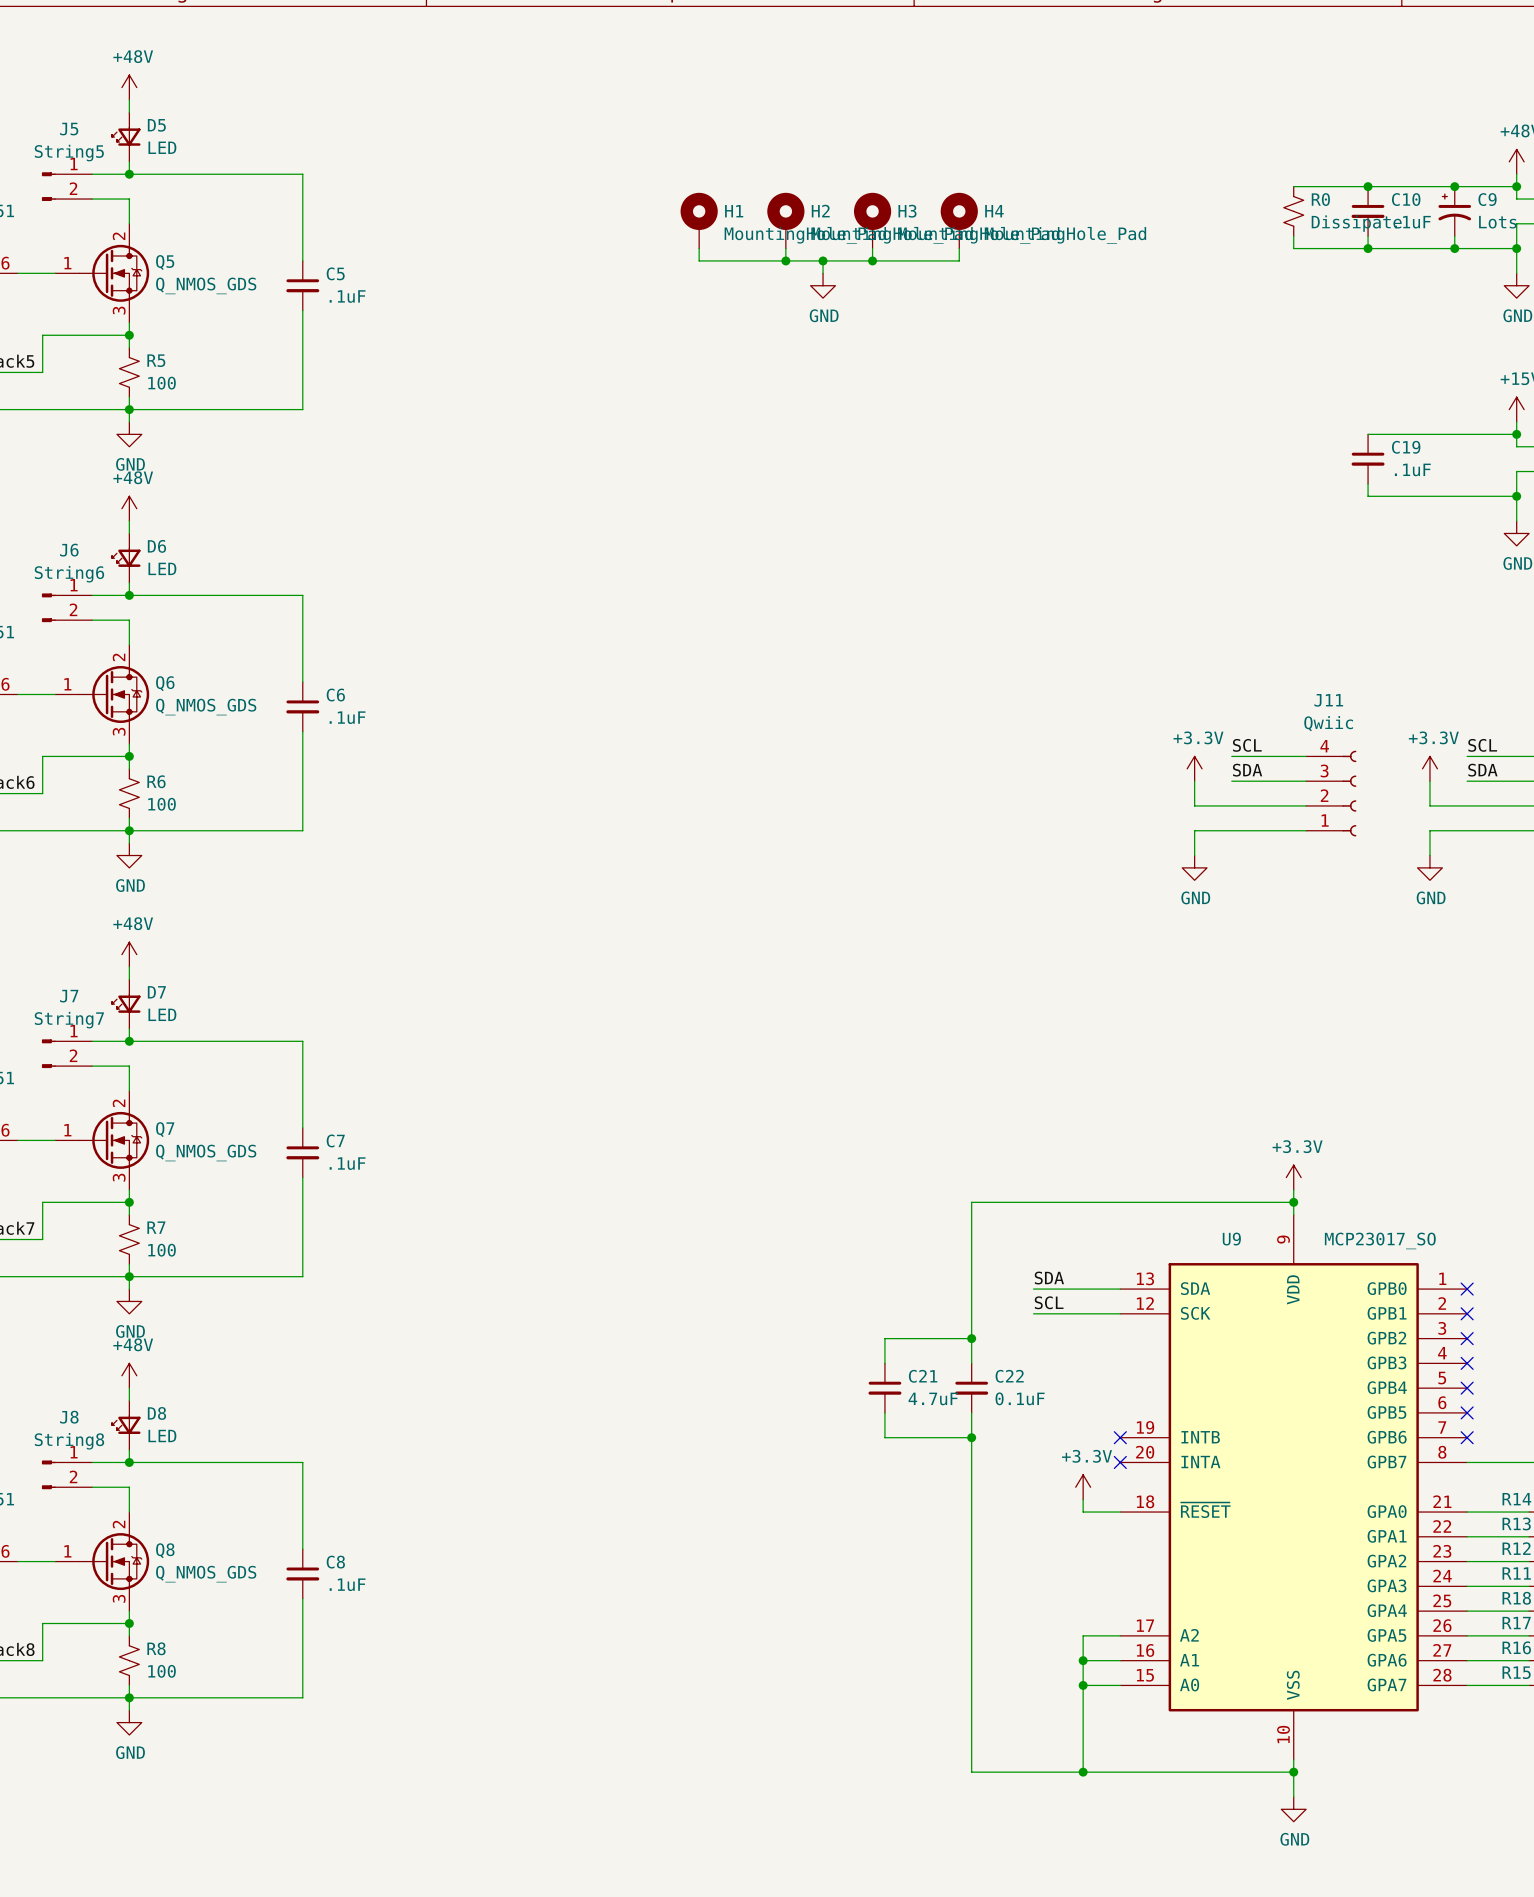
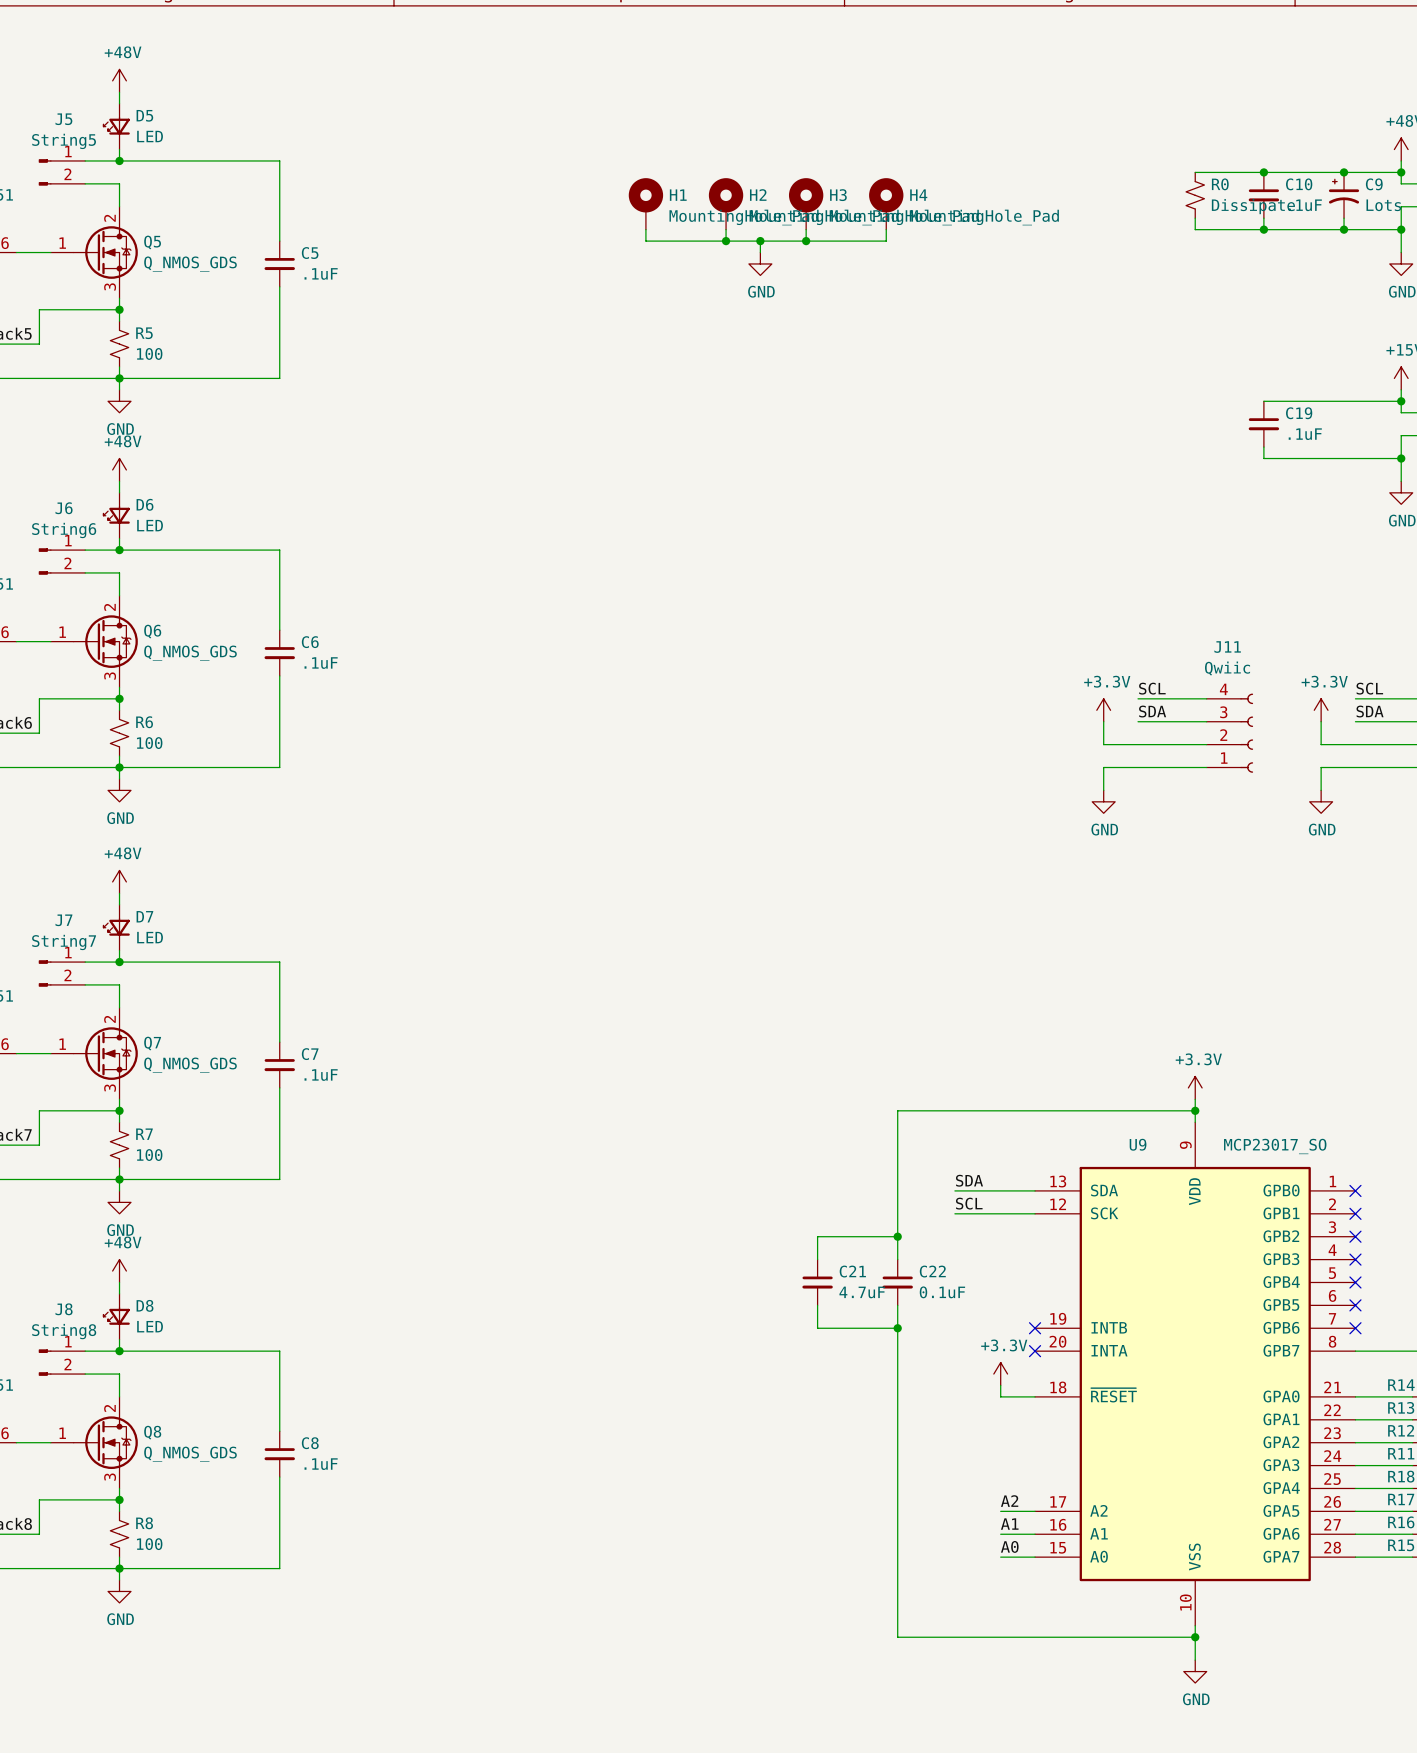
label: none -> A2 (1009, 1501)
wire: (1083, 1635) (1083, 1772) -> none
label: none -> A1 (1009, 1524)
junction: (1083, 1660) -> none
label: none -> A0 (1009, 1546)
junction: (1083, 1685) -> none
junction: (1083, 1772) -> none

